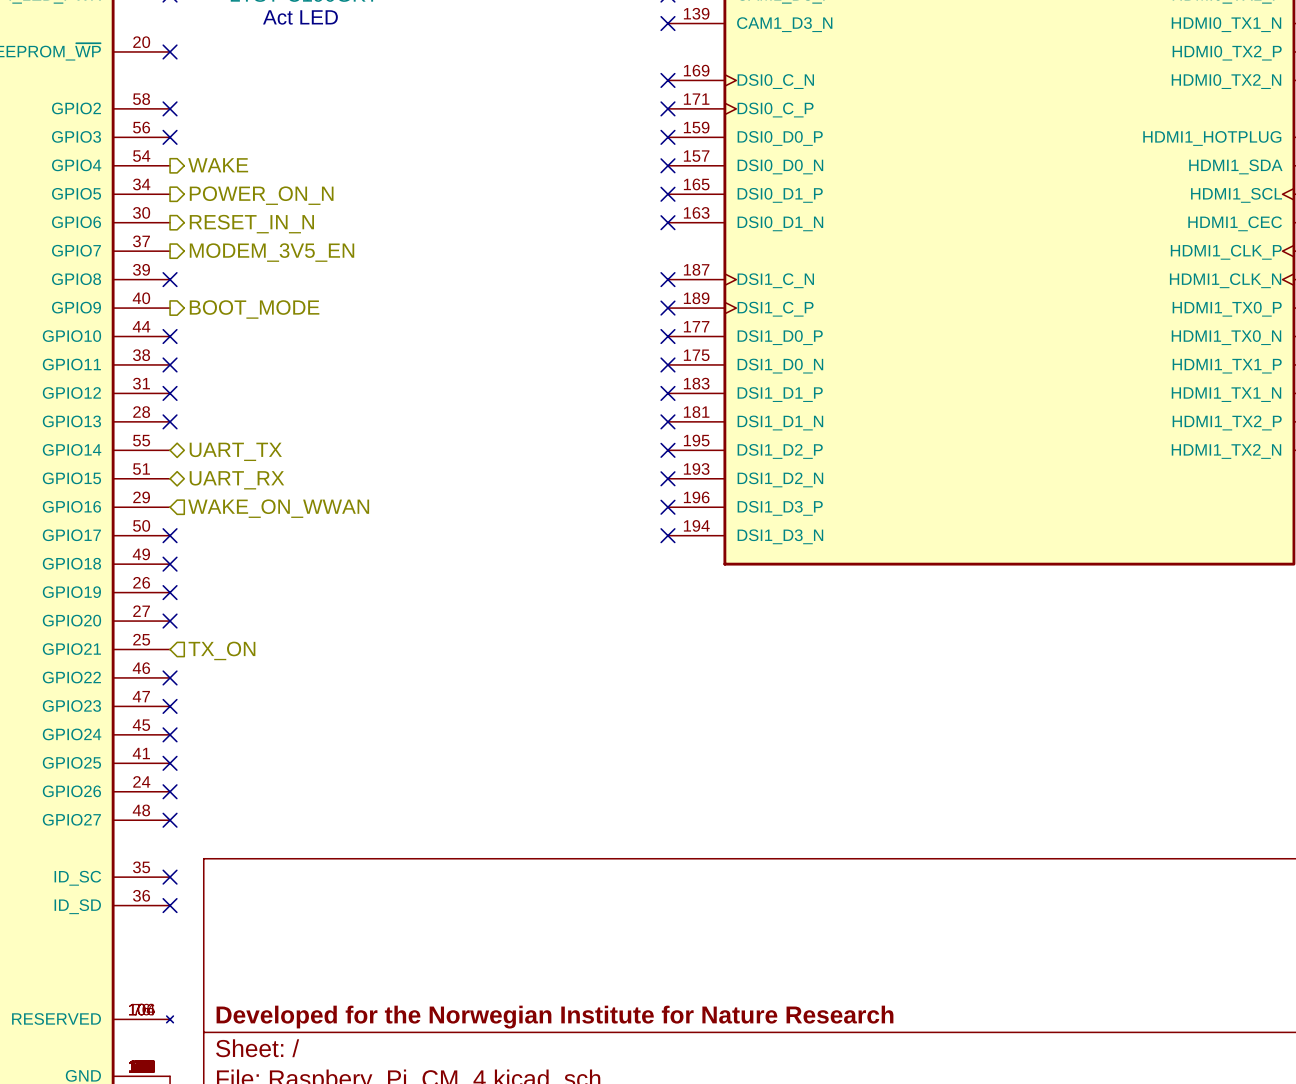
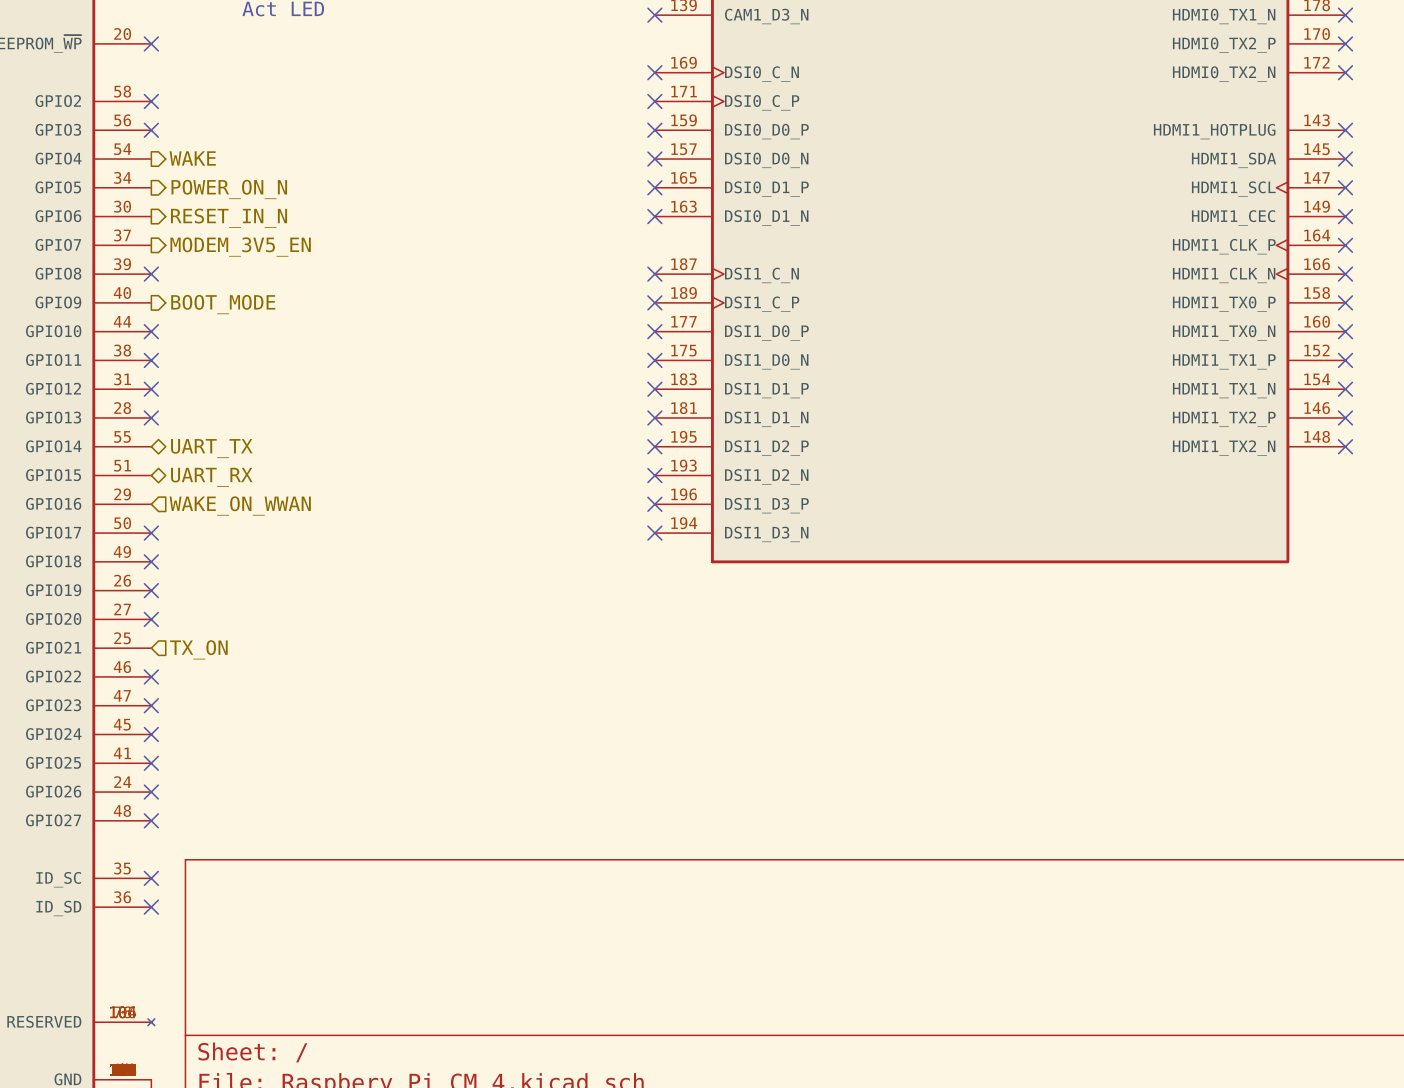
title block: Developed for the Norwegian Institute for Nature Research (554, 1017) -> none

